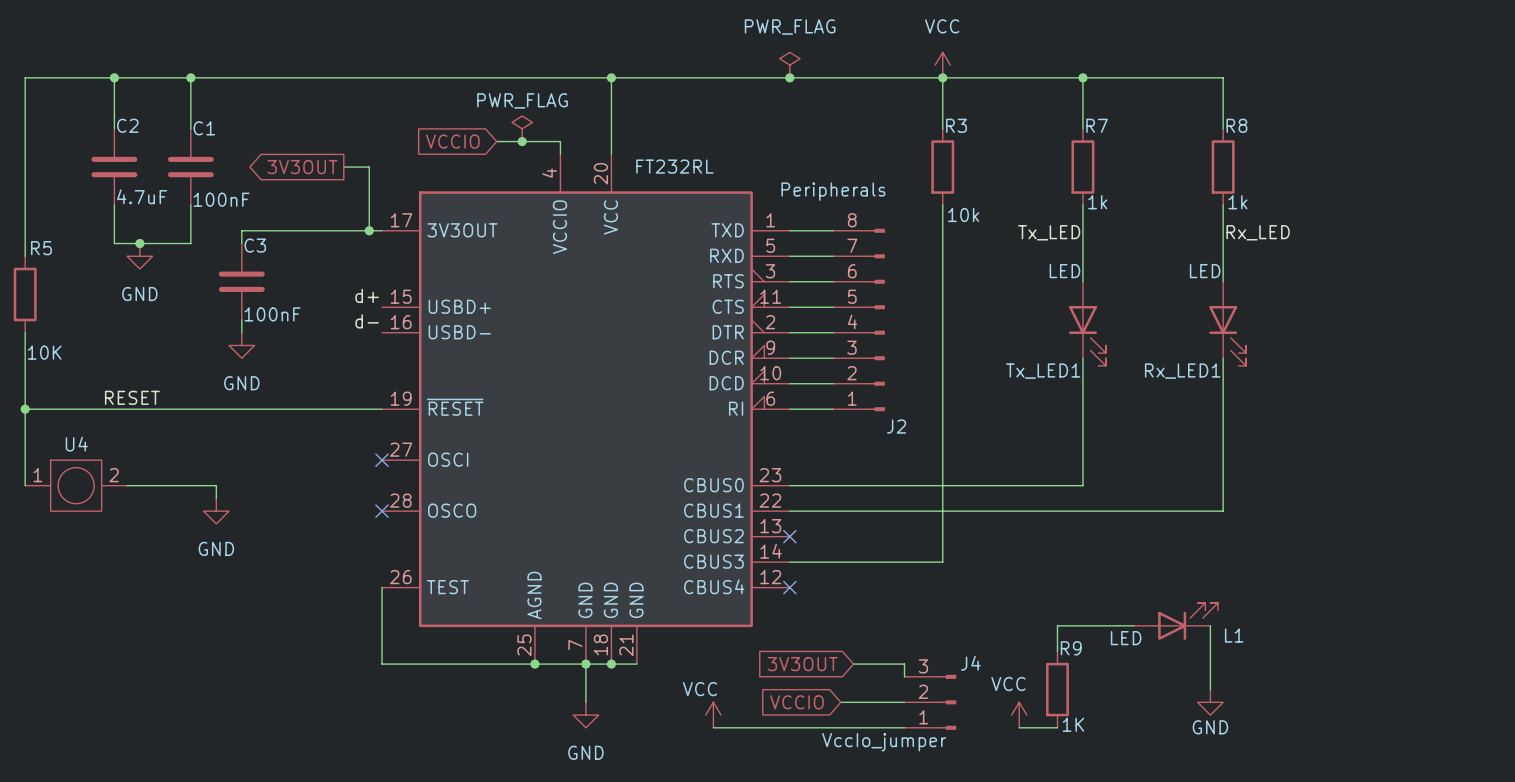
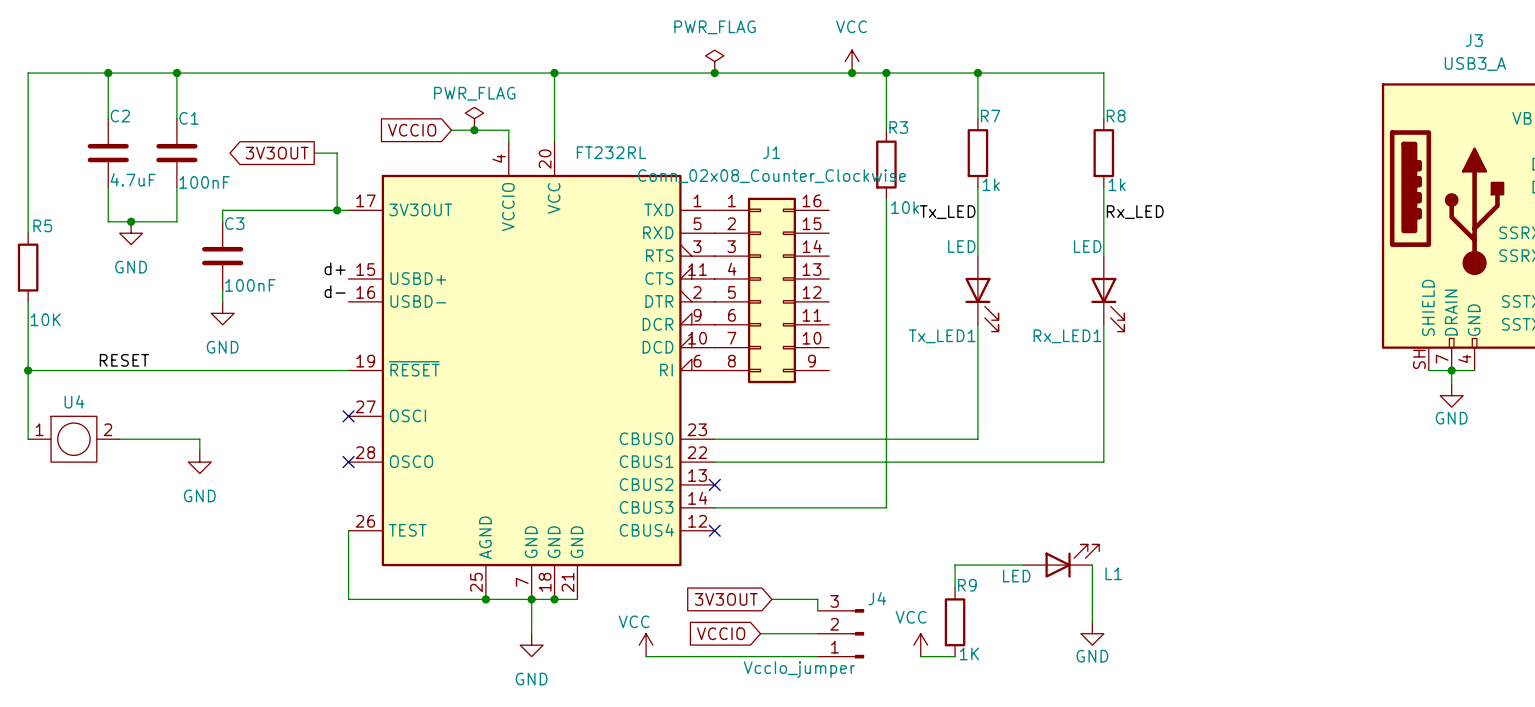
wire: (942, 77) (942, 128) -> none
wire: none -> (886, 73) (886, 130)
junction: none -> (886, 73)
R3 position: (942, 167) -> (886, 164)
wire: (942, 205) (942, 562) -> (886, 198) (886, 507) (852, 507)
J1: none -> Conn_02x08_Counter_Clockwise (771, 290)
J2: Peripherals (859, 319) -> none

